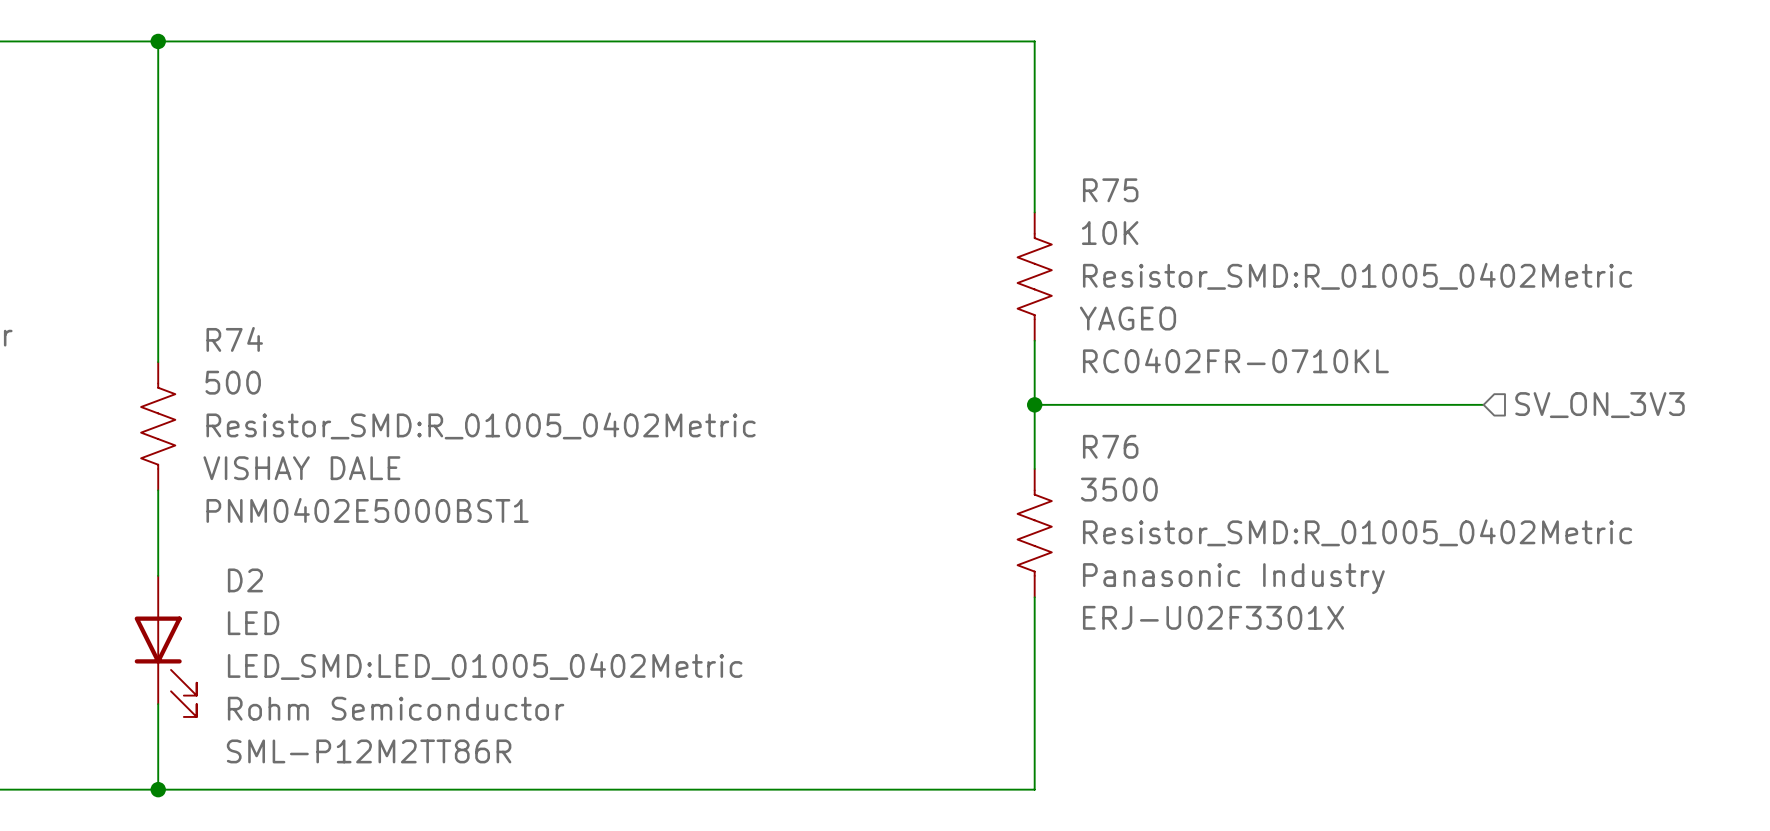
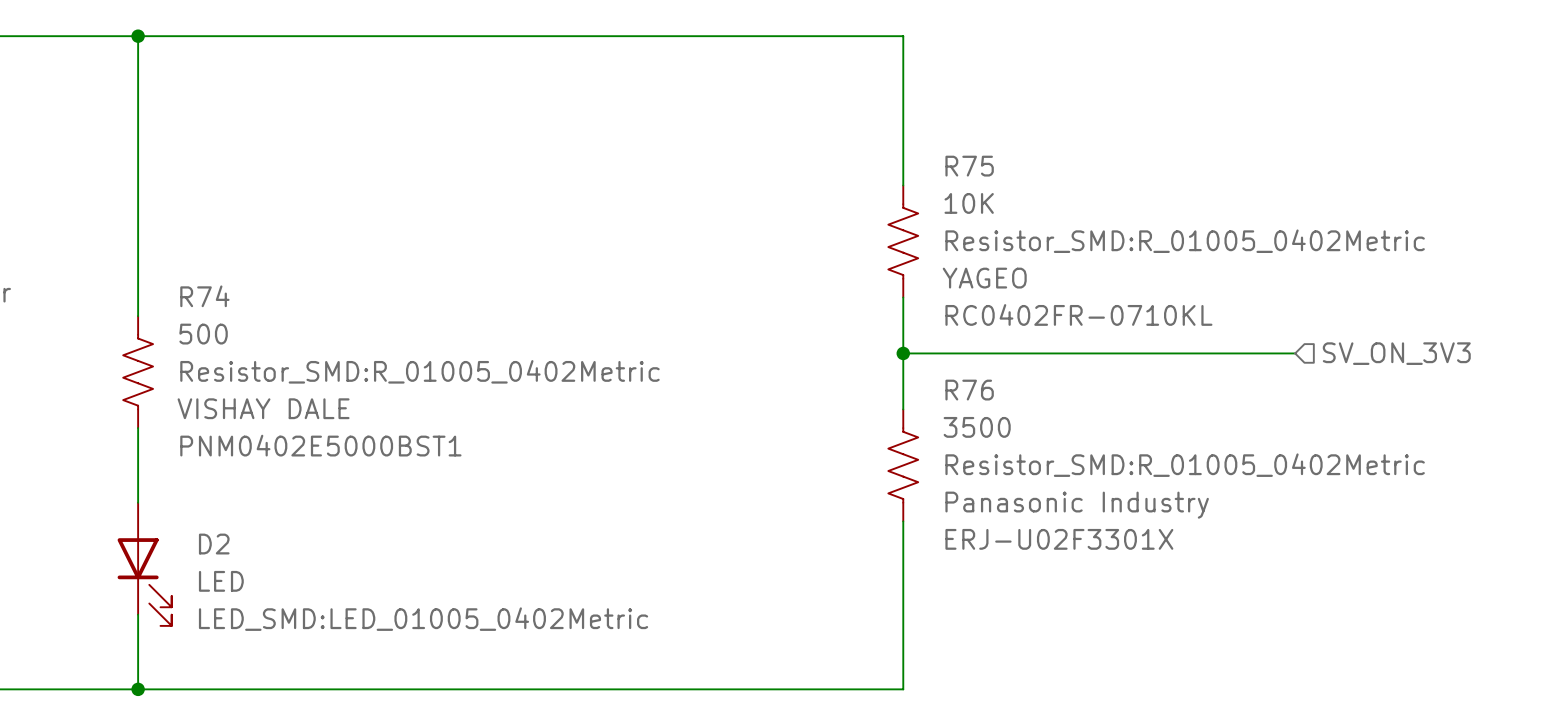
D2 name position: D2 (245, 580) -> D2 (214, 544)
D2 value position: LED (253, 623) -> LED (221, 581)
D2 text position: LED_SMD:LED_01005_0402Metric (485, 666) -> LED_SMD:LED_01005_0402Metric (423, 619)
D2 text: Rohm Semiconductor (396, 708) -> none
D2 text: SML-P12M2TT86R (369, 751) -> none

